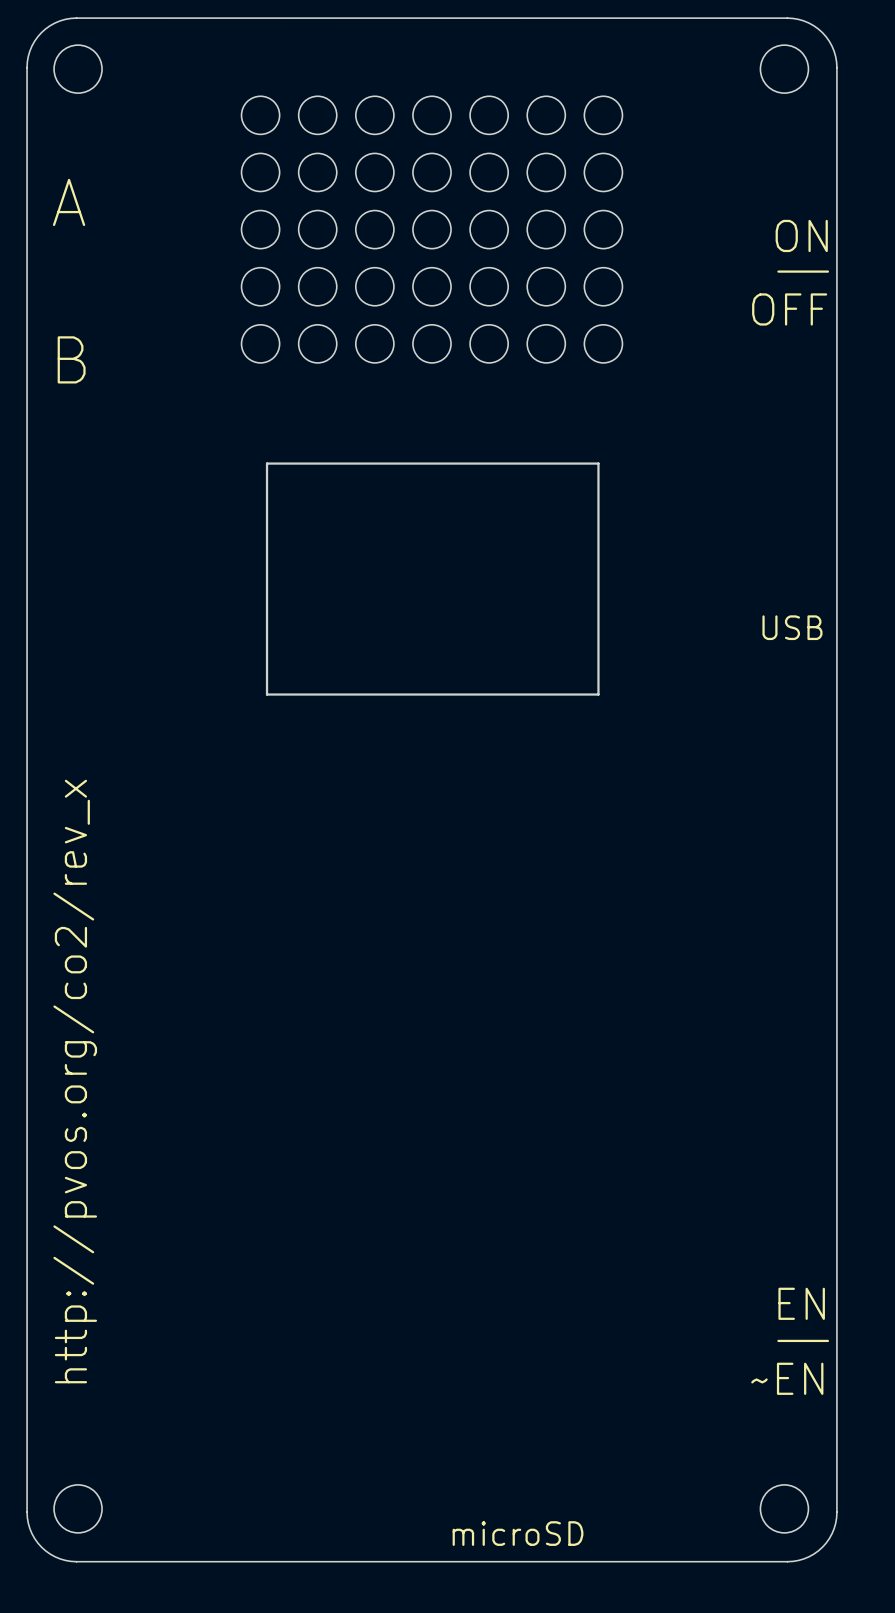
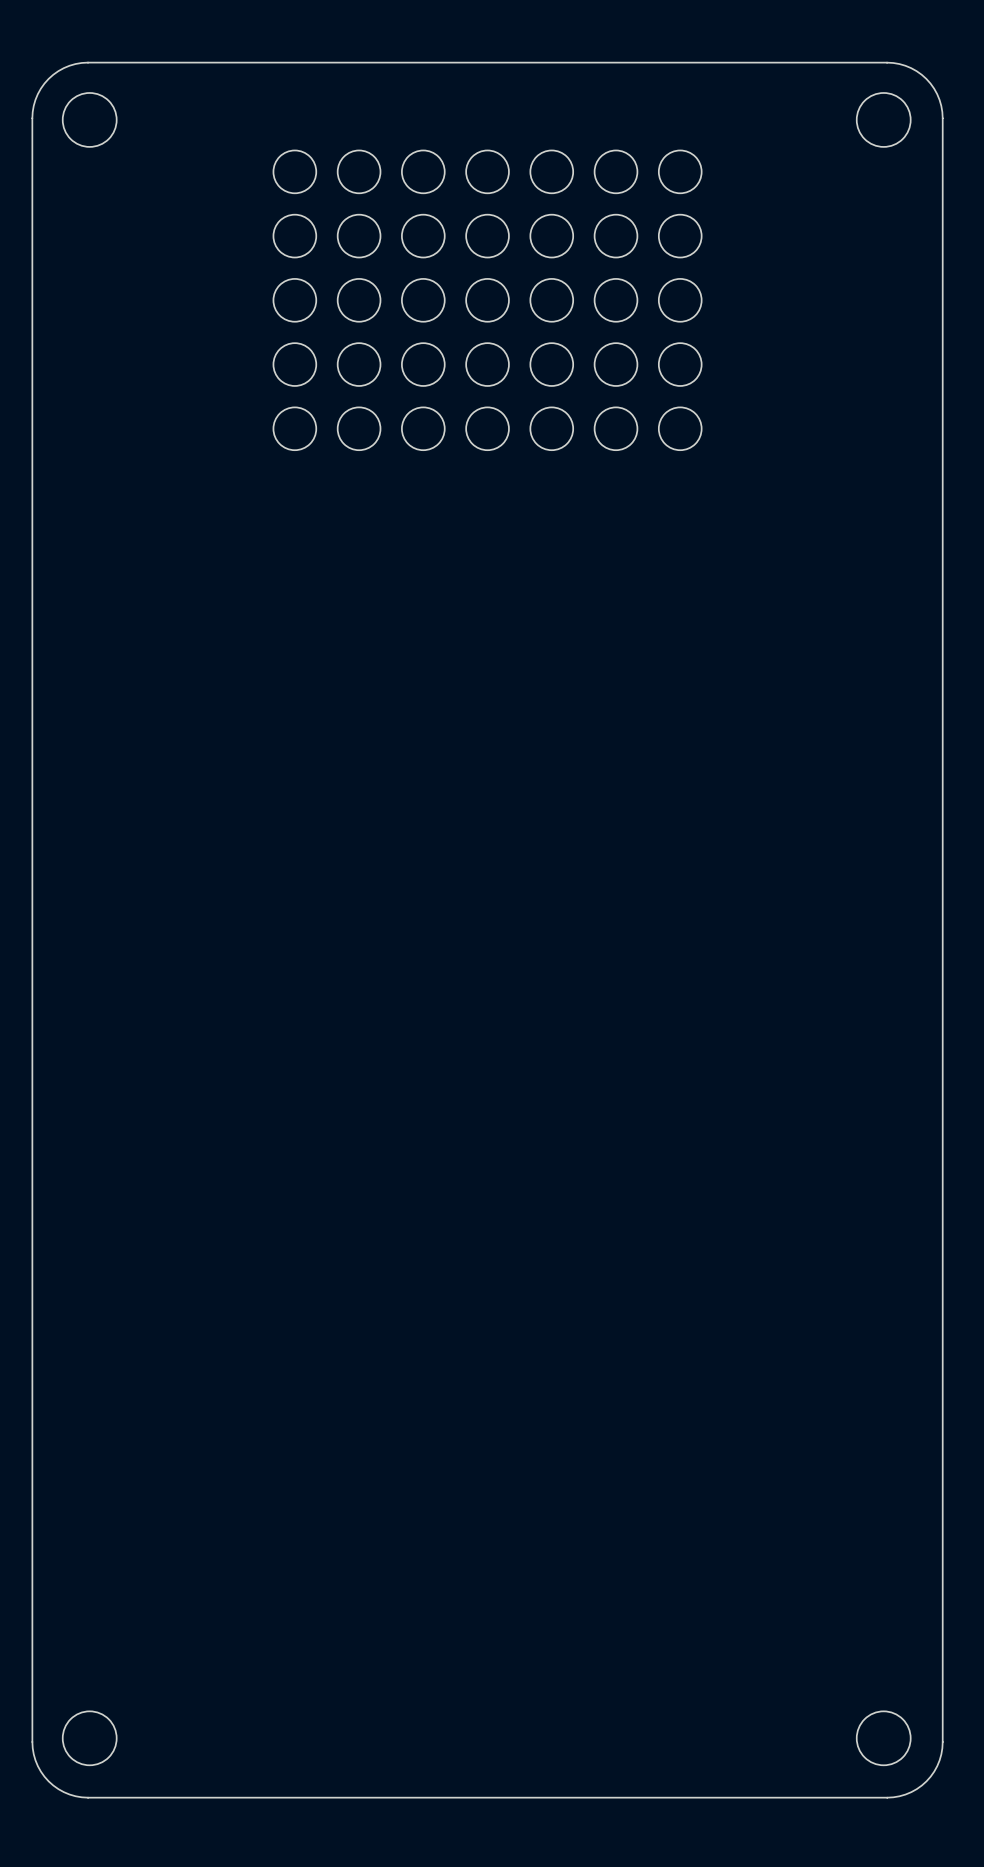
text: A (69, 202) -> none
text: ON (801, 235) -> none
line: (778, 271) (827, 271) -> none
text: OFF (789, 309) -> none
text: B (71, 359) -> none
board edge: (267, 463) (598, 463) (598, 694) (267, 694) (267, 463) -> none
text: USB (792, 627) -> none
text: http://pvos.org/co2/rev_x (75, 1081) -> none
text: EN (801, 1303) -> none
line: (778, 1340) (827, 1340) -> none
text: ~EN (787, 1378) -> none
text: microSD (518, 1533) -> none

